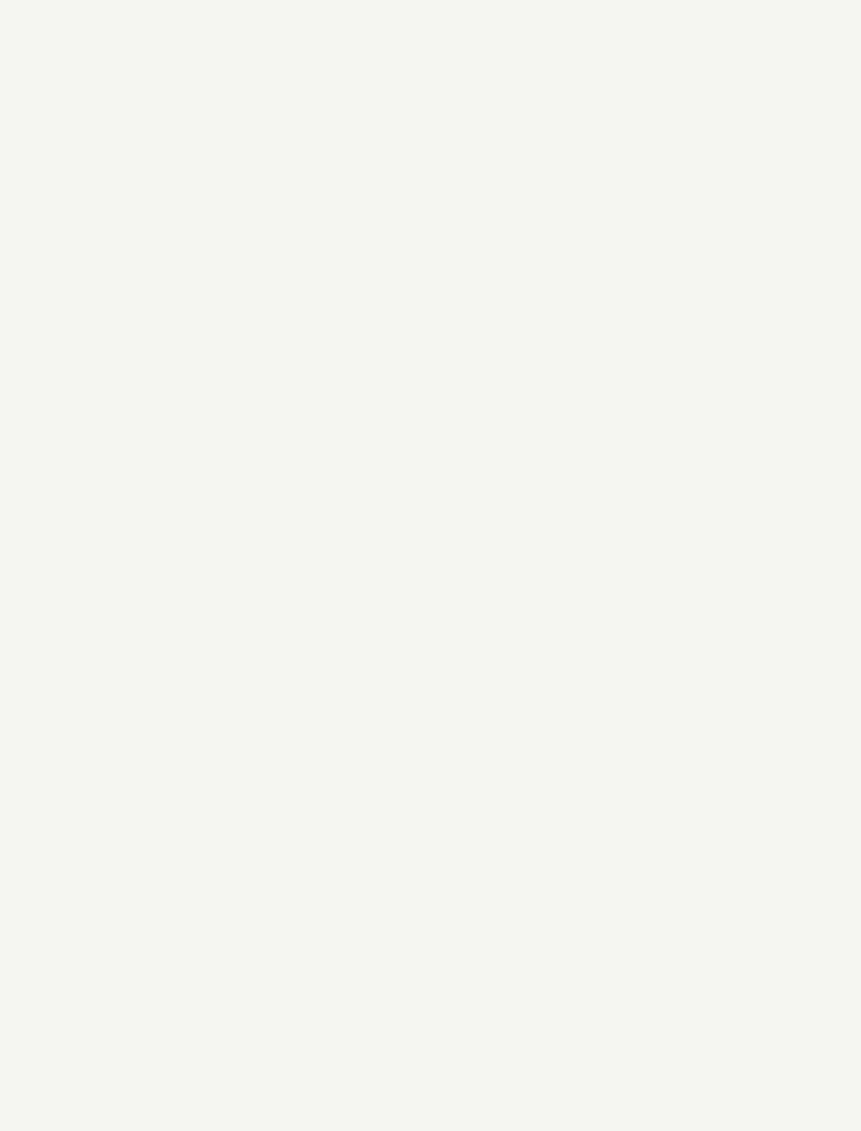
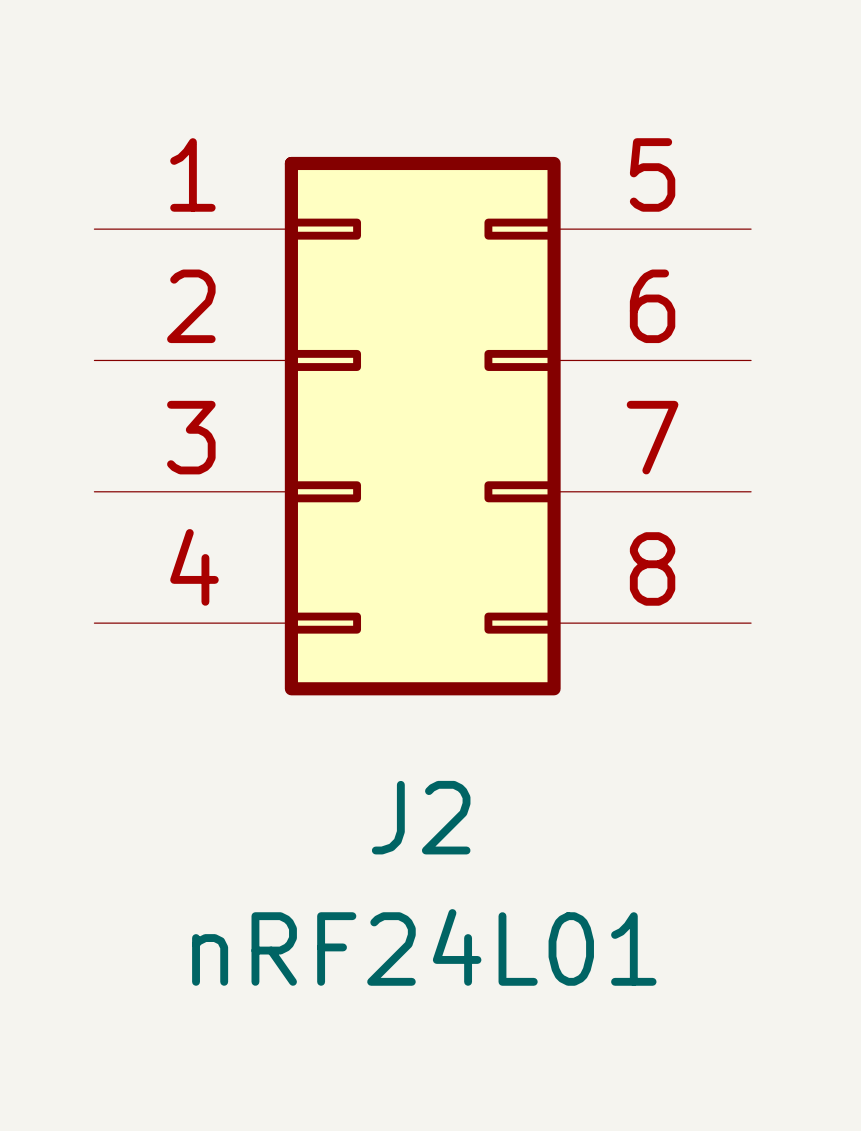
J2: none -> nRF24L01 (422, 426)

